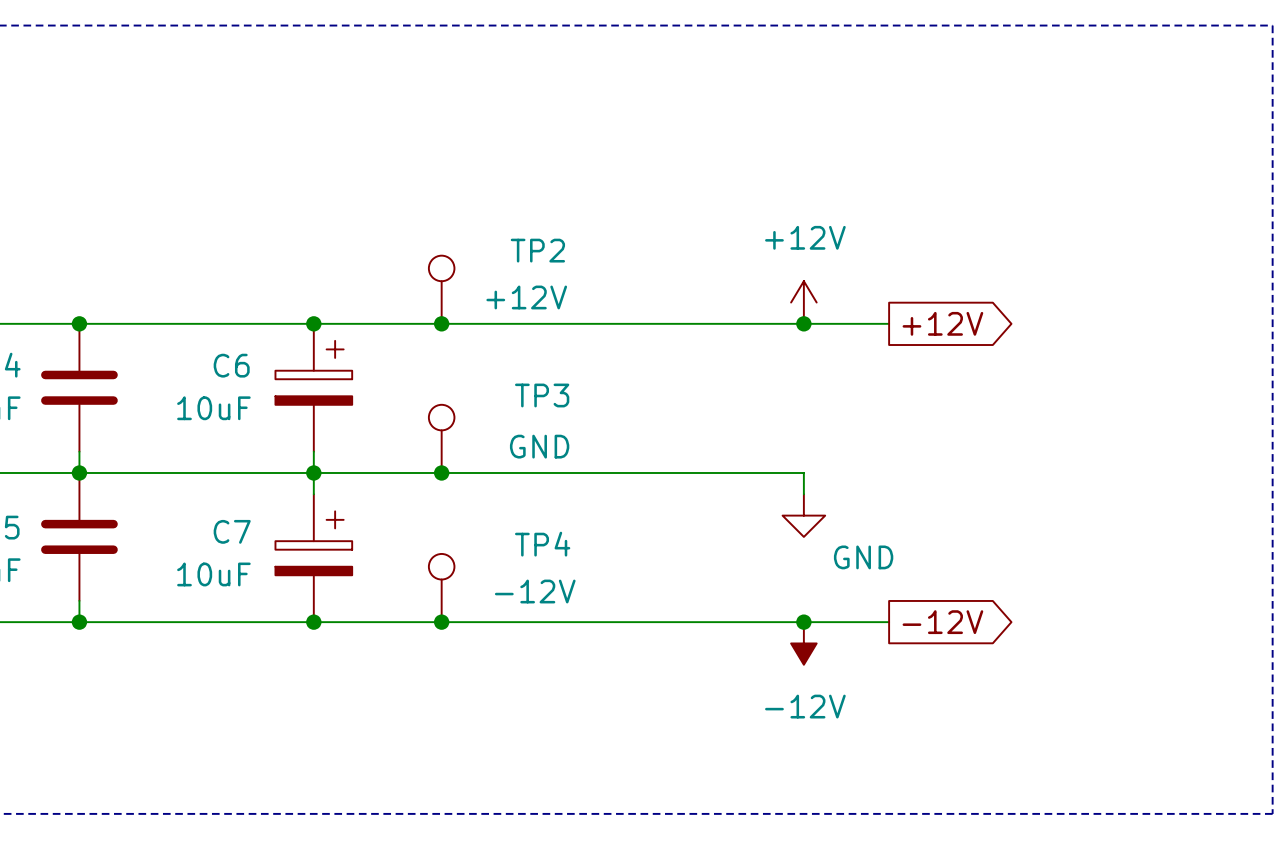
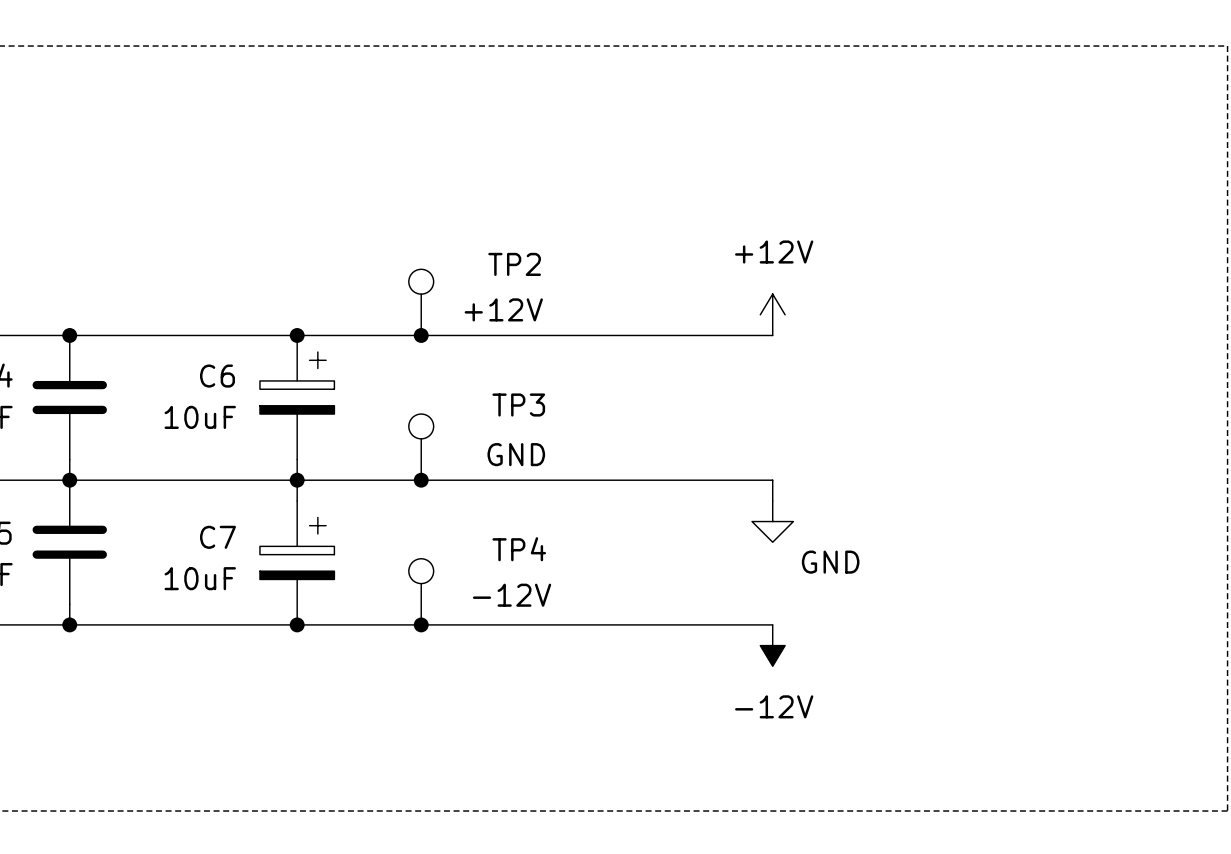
wire: (803, 323) (889, 323) -> none
junction: (803, 323) -> none
global label: +12V (942, 323) -> none
wire: (803, 622) (889, 622) -> none
junction: (803, 622) -> none
global label: -12V (942, 622) -> none

